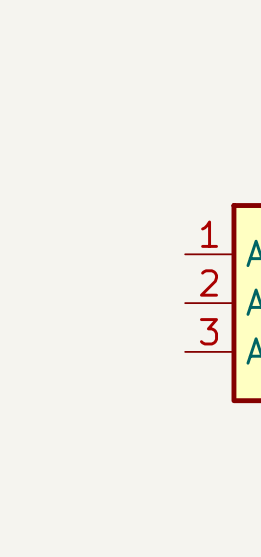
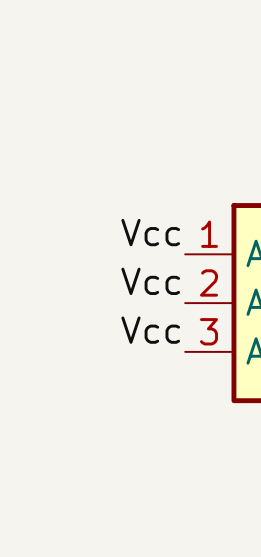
label: none -> Vcc (150, 232)
label: none -> Vcc (150, 281)
label: none -> Vcc (150, 330)

